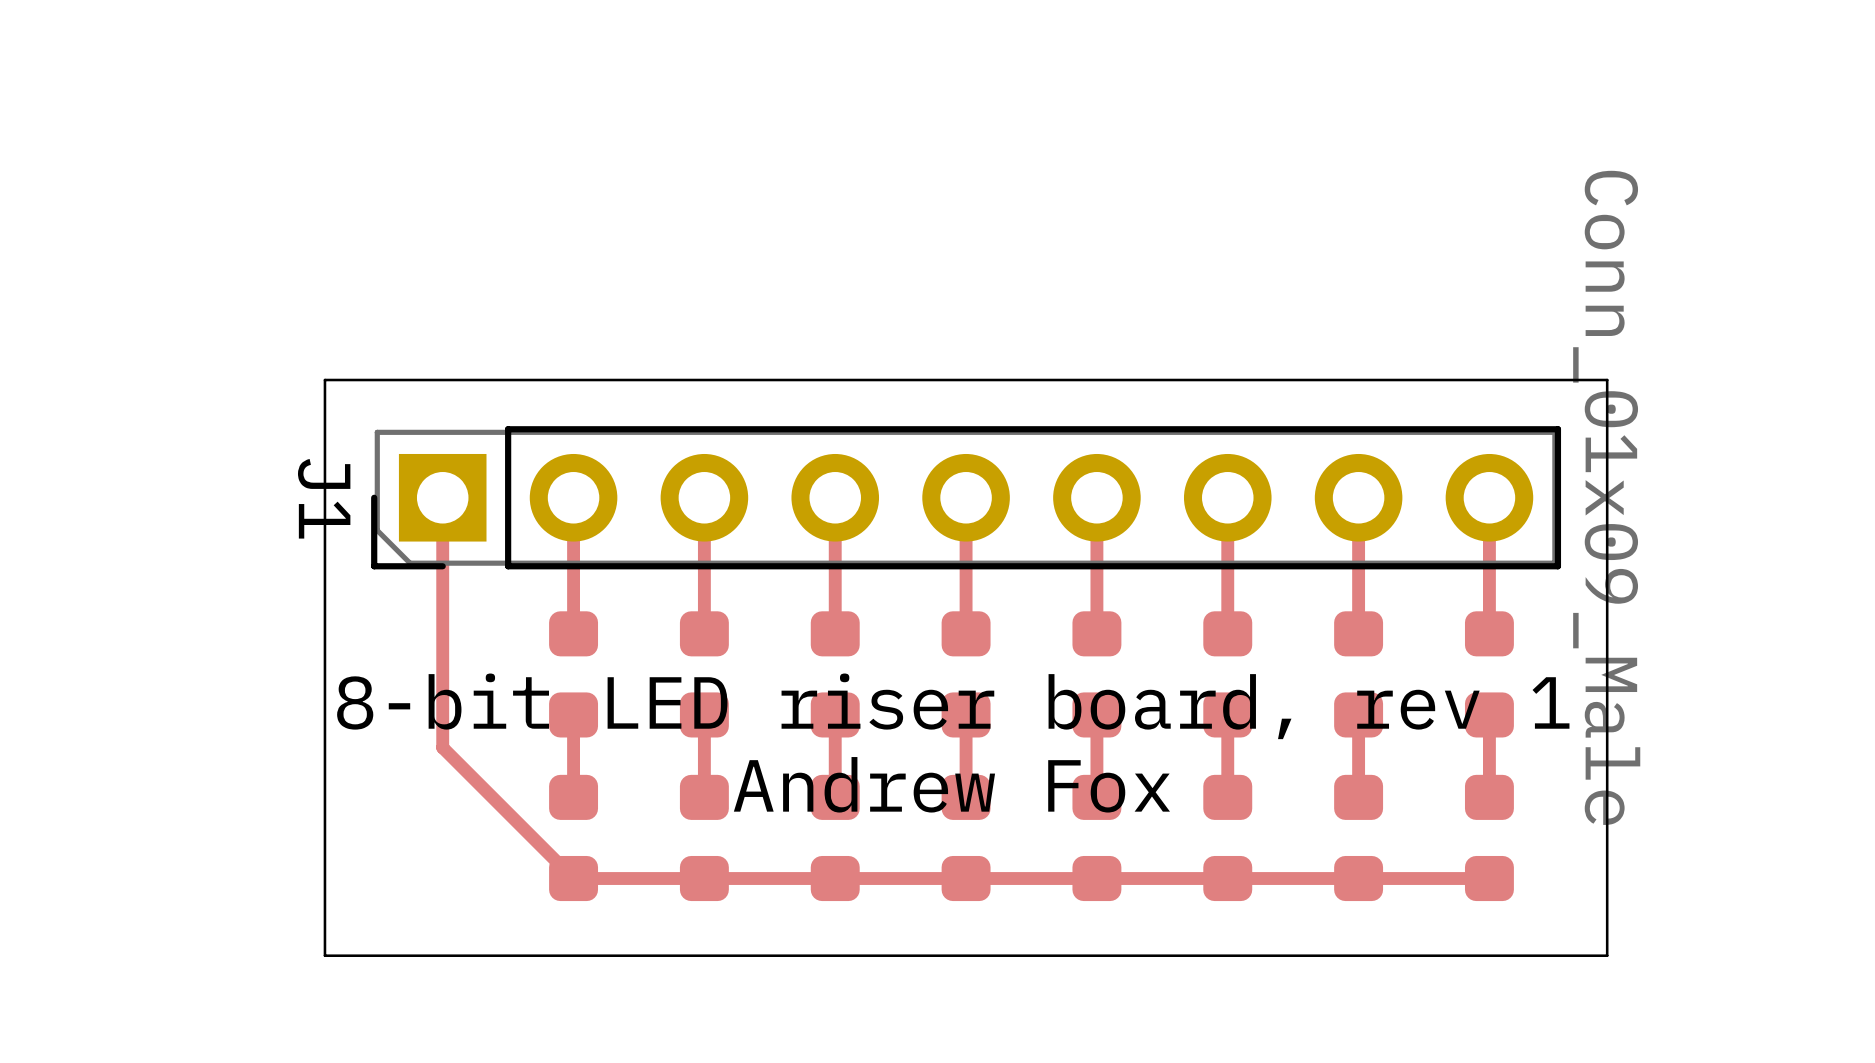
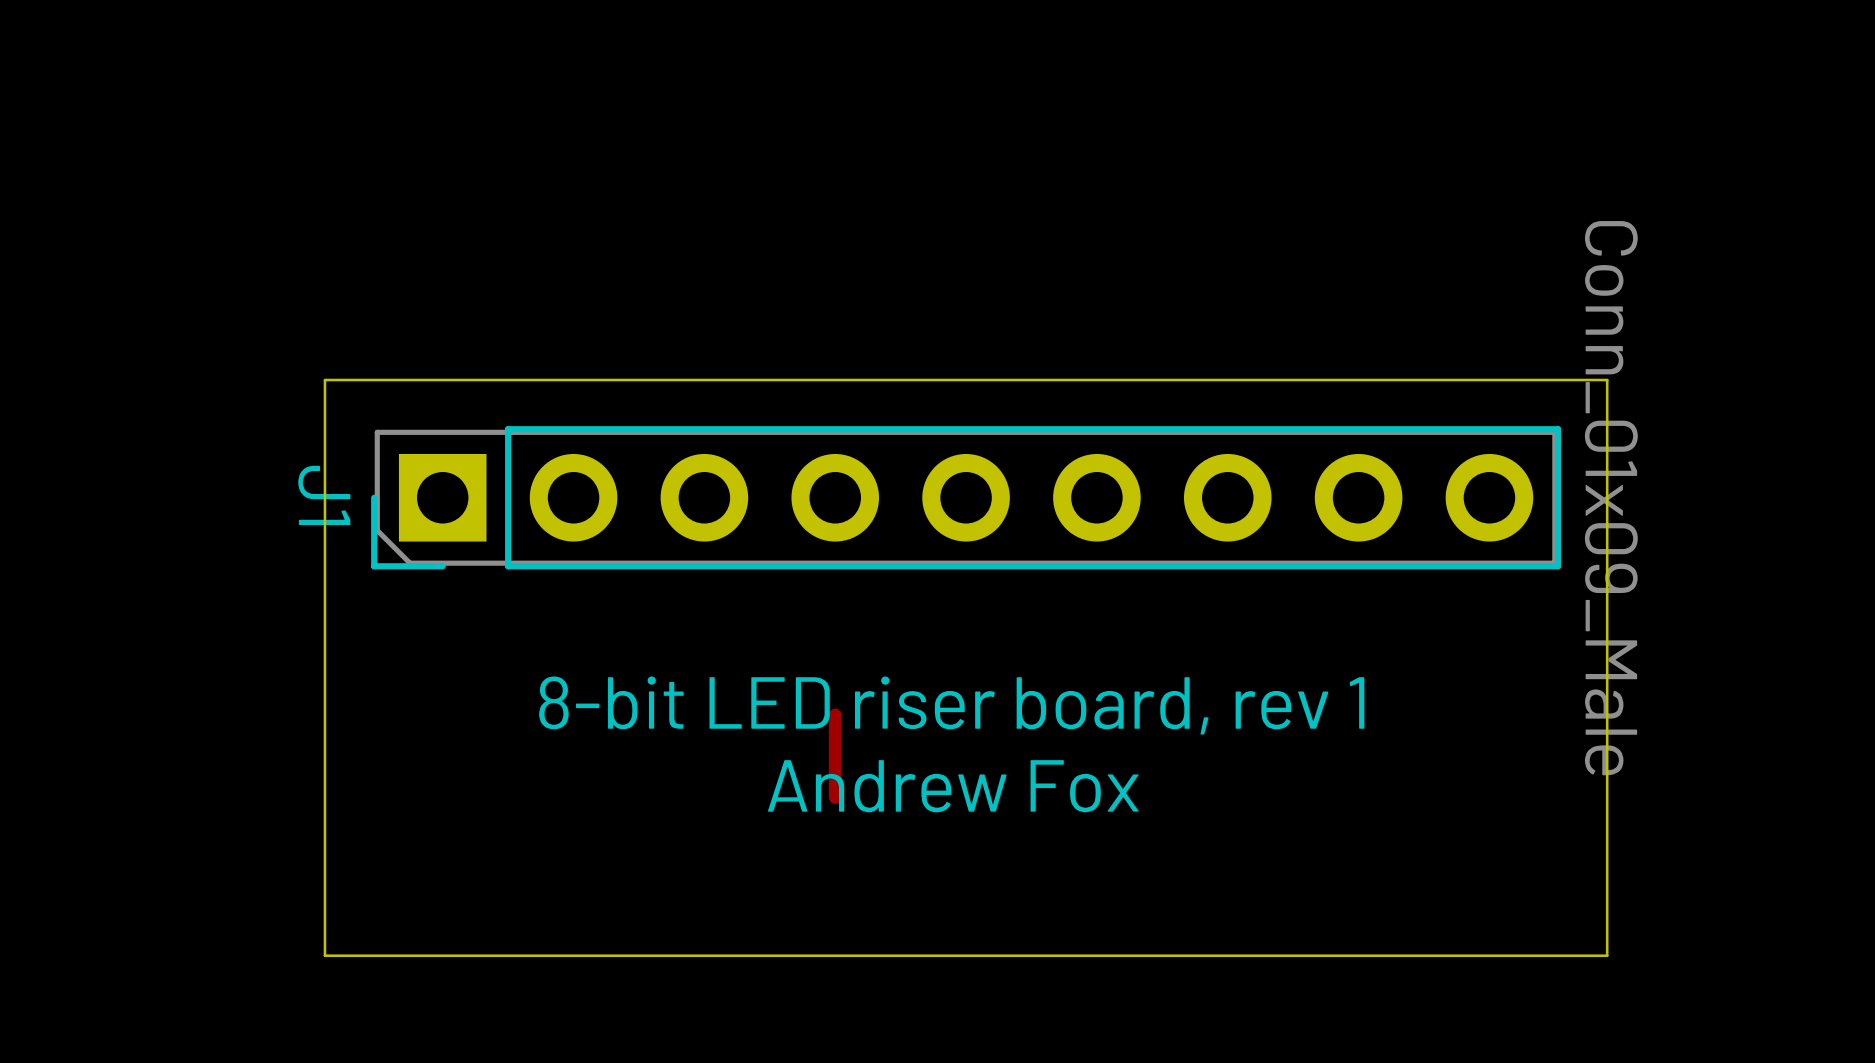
top track: (442, 503) (442, 747) (573, 878) (1489, 878) -> none
top track: (573, 503) (573, 633) -> none
top track: (704, 503) (704, 633) -> none
top track: (835, 503) (835, 633) -> none
top track: (966, 503) (966, 633) -> none
top track: (1096, 503) (1096, 633) -> none
top track: (1227, 503) (1227, 633) -> none
top track: (1358, 503) (1358, 633) -> none
top track: (1489, 503) (1489, 633) -> none
part: (573, 674) -> none
part: (704, 674) -> none
part: (835, 674) -> none
part: (966, 674) -> none
part: (1096, 674) -> none
part: (1227, 674) -> none
part: (1358, 674) -> none
part: (1489, 674) -> none
top track: (573, 714) (573, 797) -> none
top track: (704, 714) (704, 797) -> none
top track: (966, 714) (966, 797) -> none
top track: (1096, 714) (1096, 797) -> none
top track: (1227, 714) (1227, 797) -> none
top track: (1358, 714) (1358, 797) -> none
top track: (1489, 714) (1489, 797) -> none
part: (573, 837) -> none
part: (704, 837) -> none
part: (835, 837) -> none
part: (966, 837) -> none
part: (1096, 837) -> none
part: (1227, 837) -> none
part: (1358, 837) -> none
part: (1489, 837) -> none

